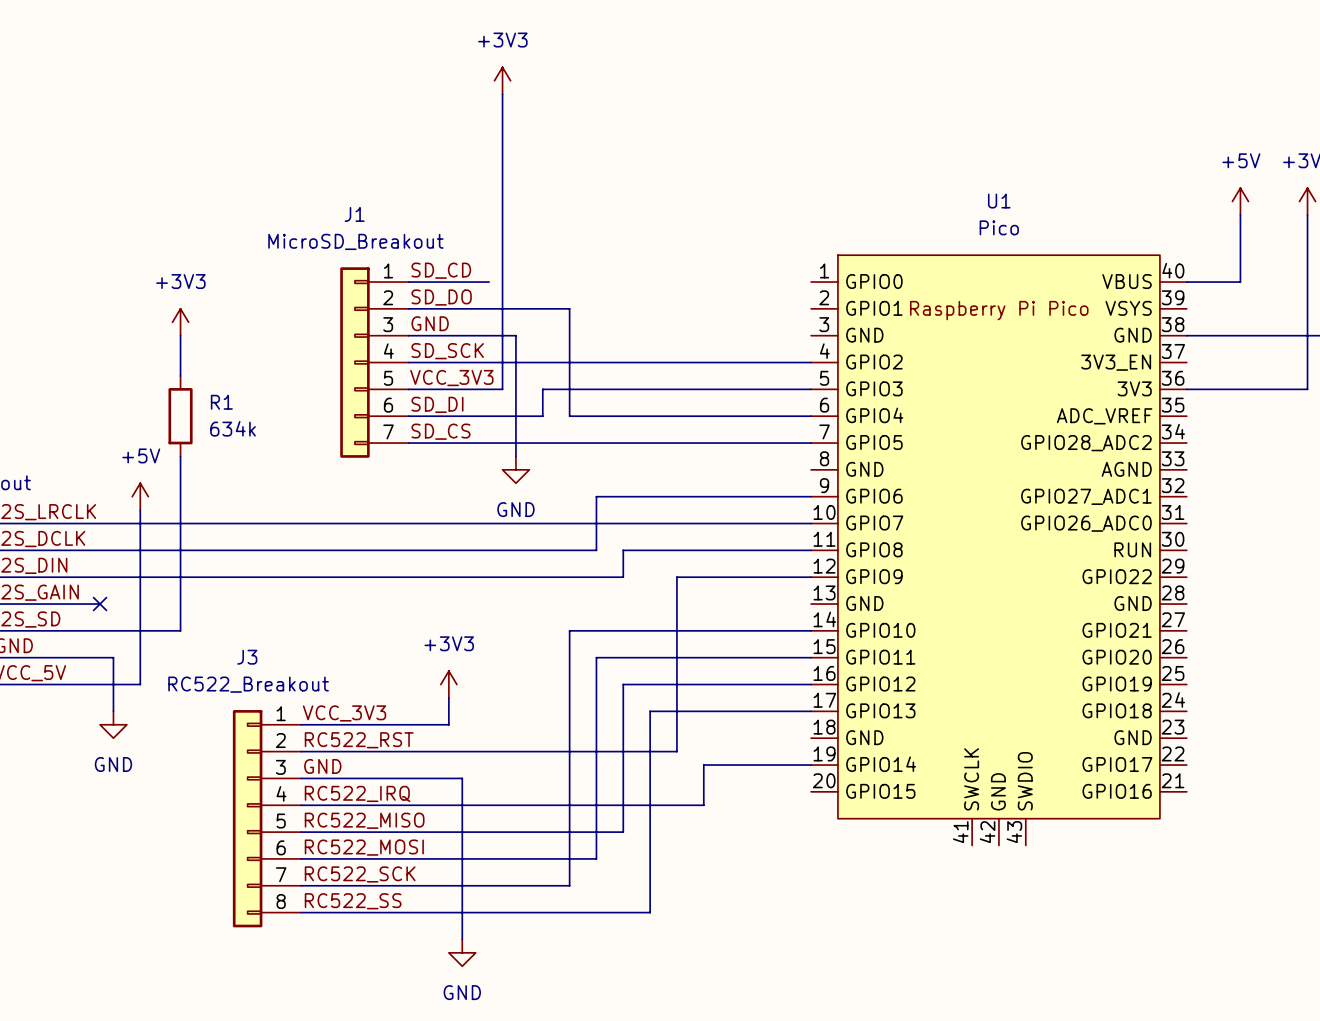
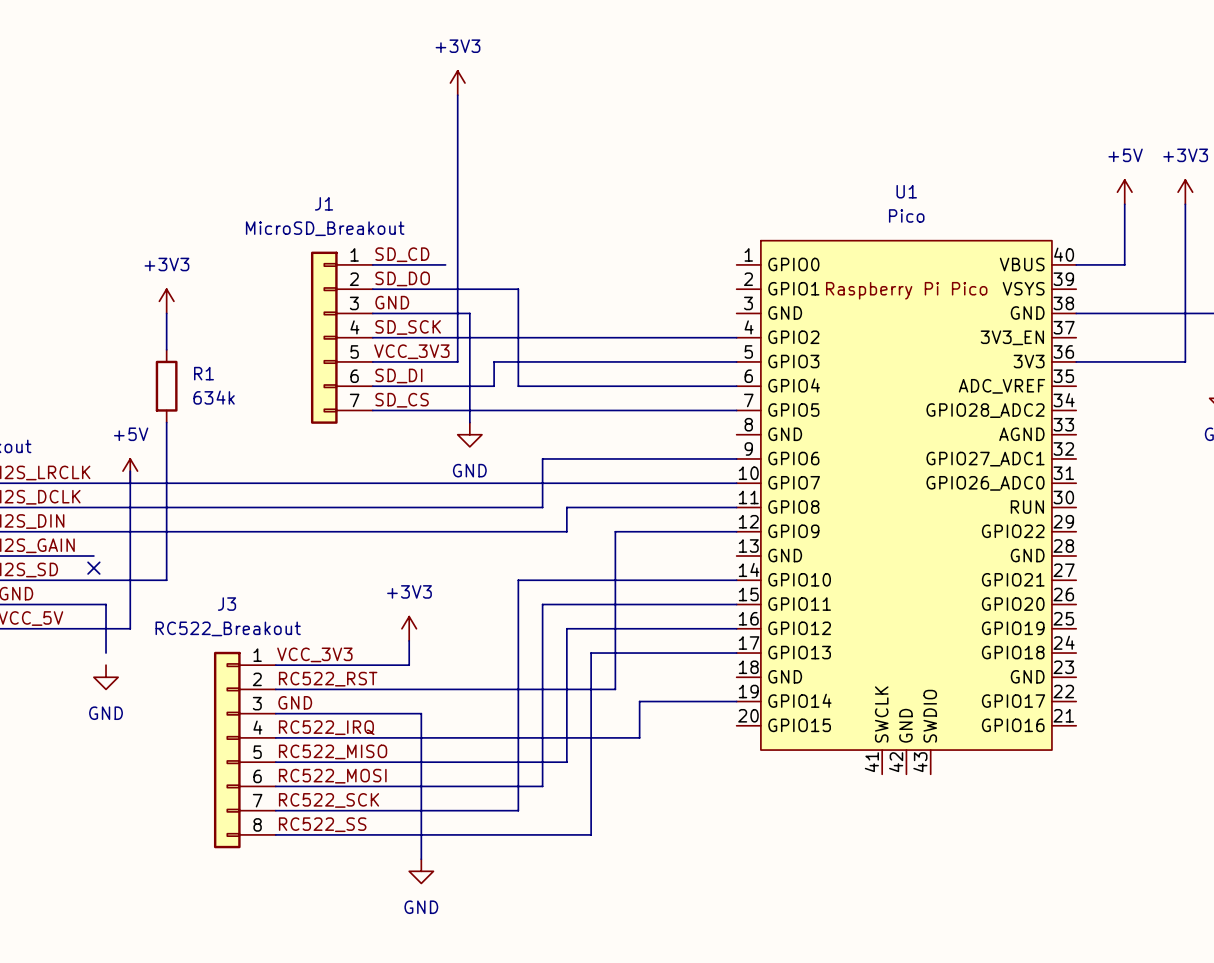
power symbol position: +5V (140, 496) -> +5V (130, 471)
no-connect mark position: (100, 604) -> (93, 568)
power symbol position: GND (113, 724) -> GND (106, 677)

